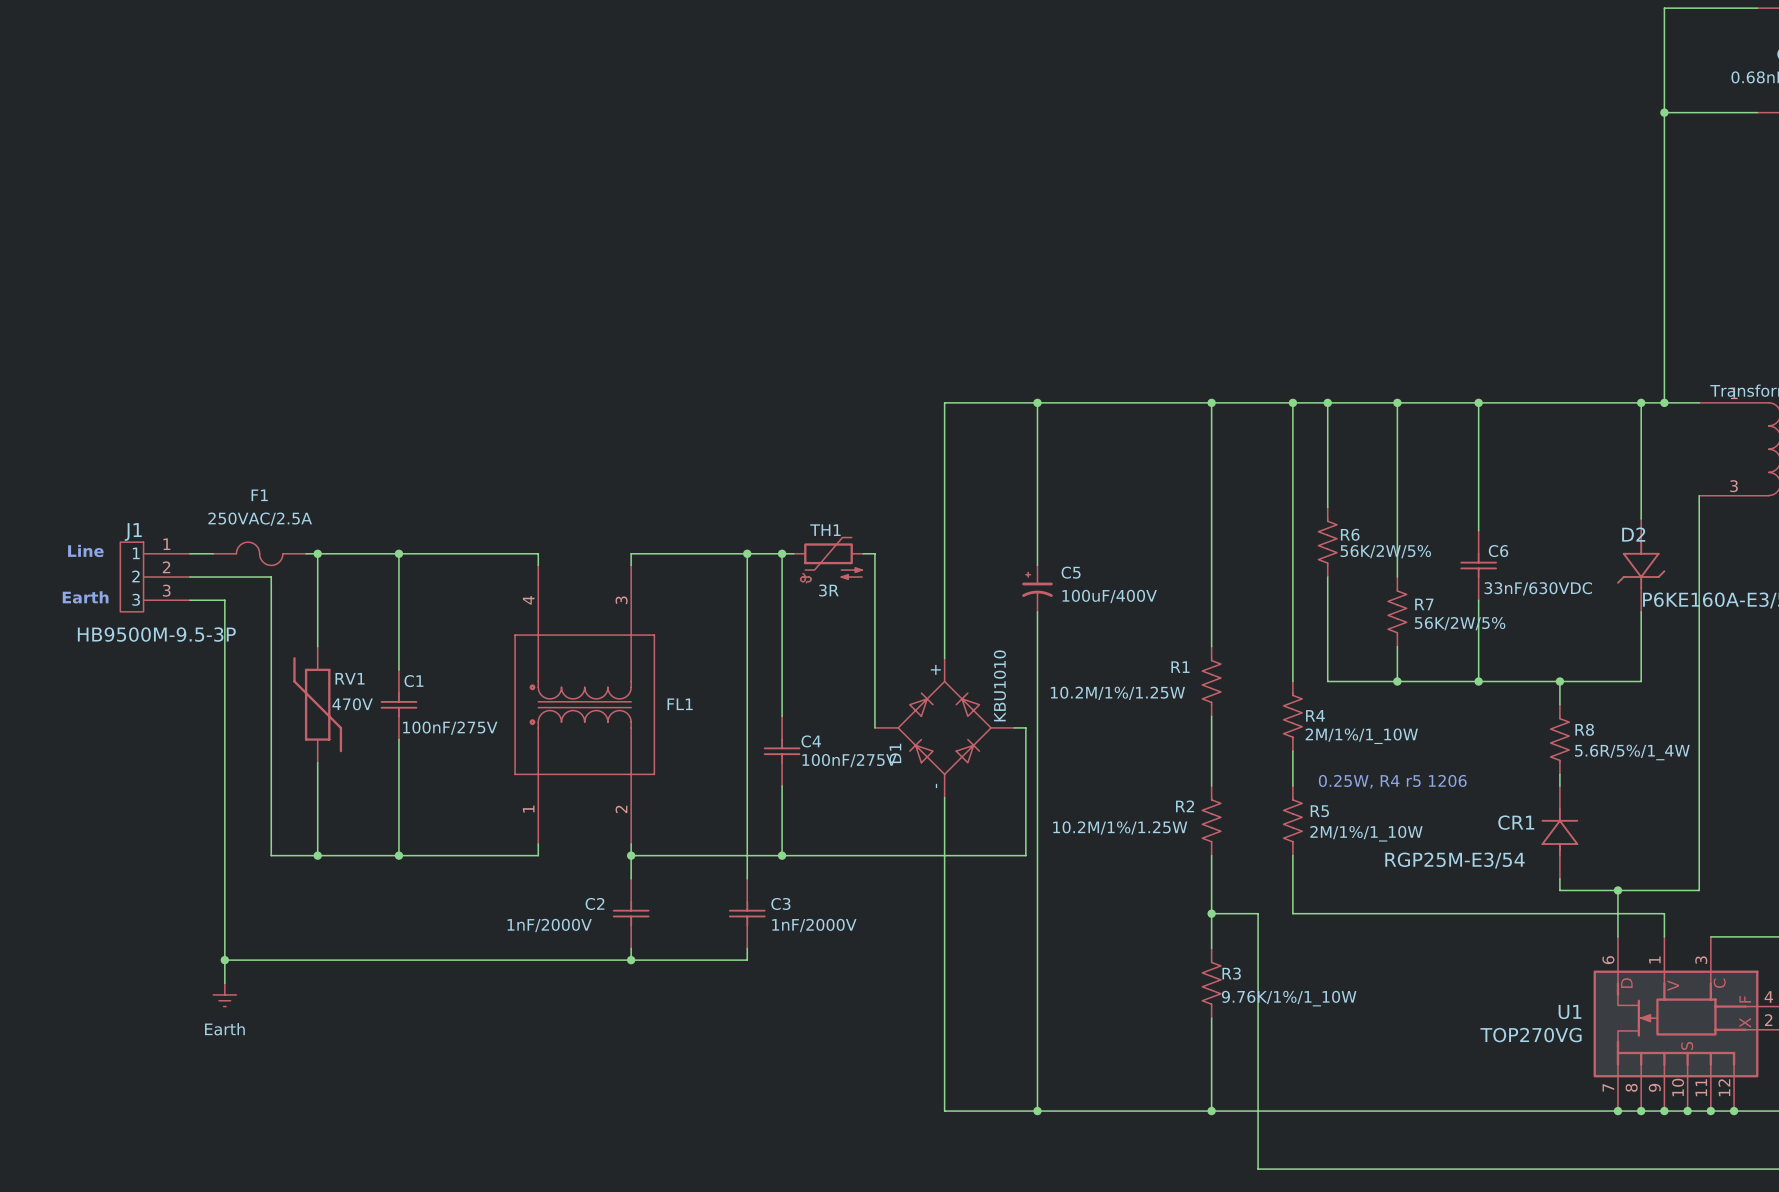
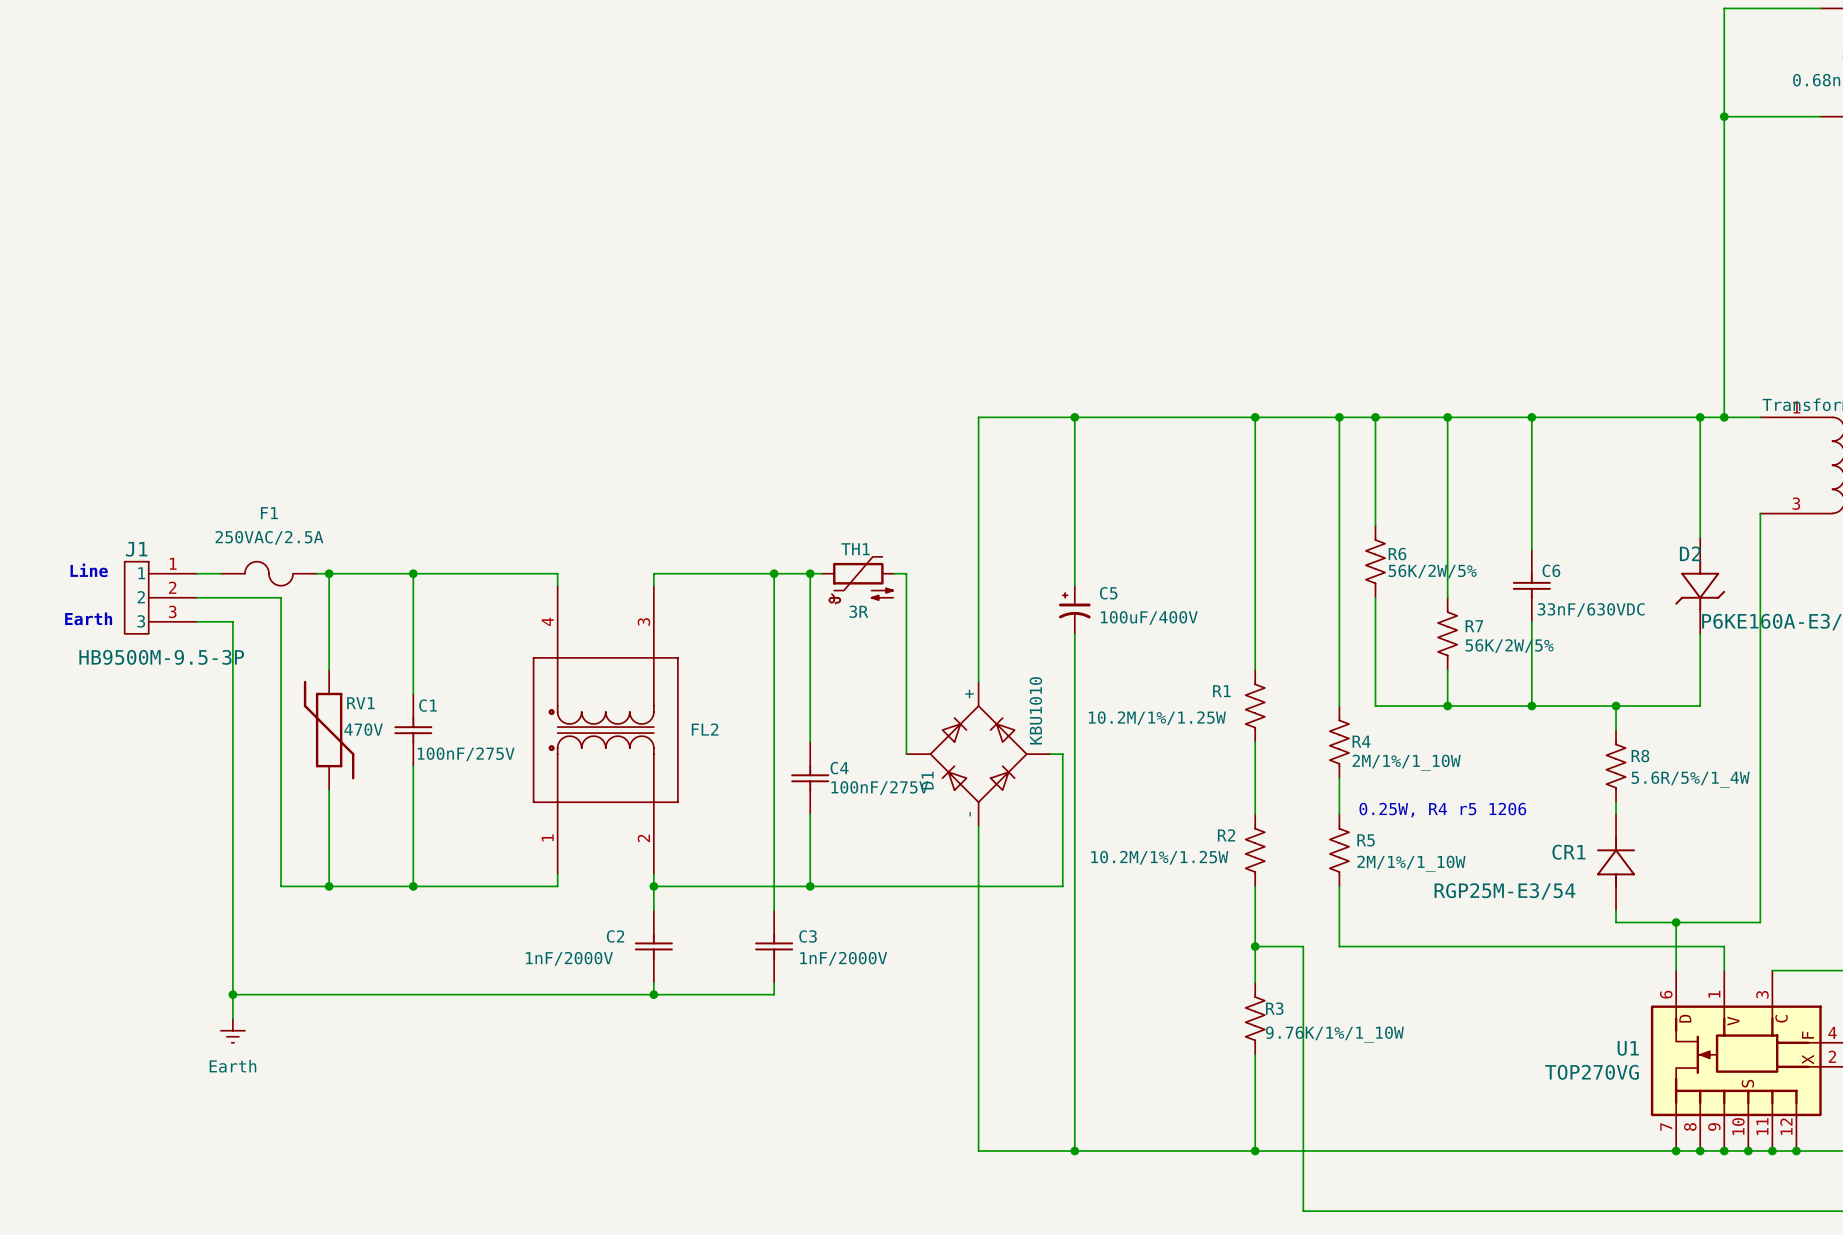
FL1 name: FL1 (680, 704) -> FL2 (705, 729)

